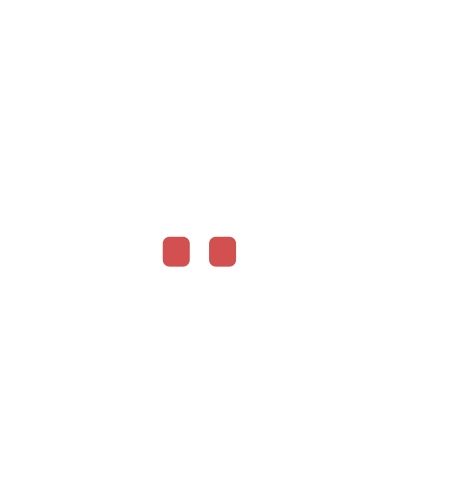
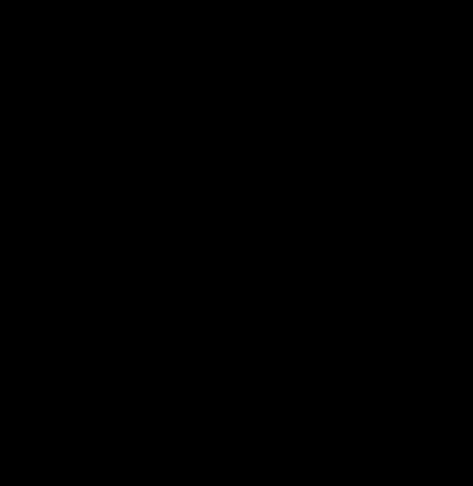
part: (199, 251) -> none

